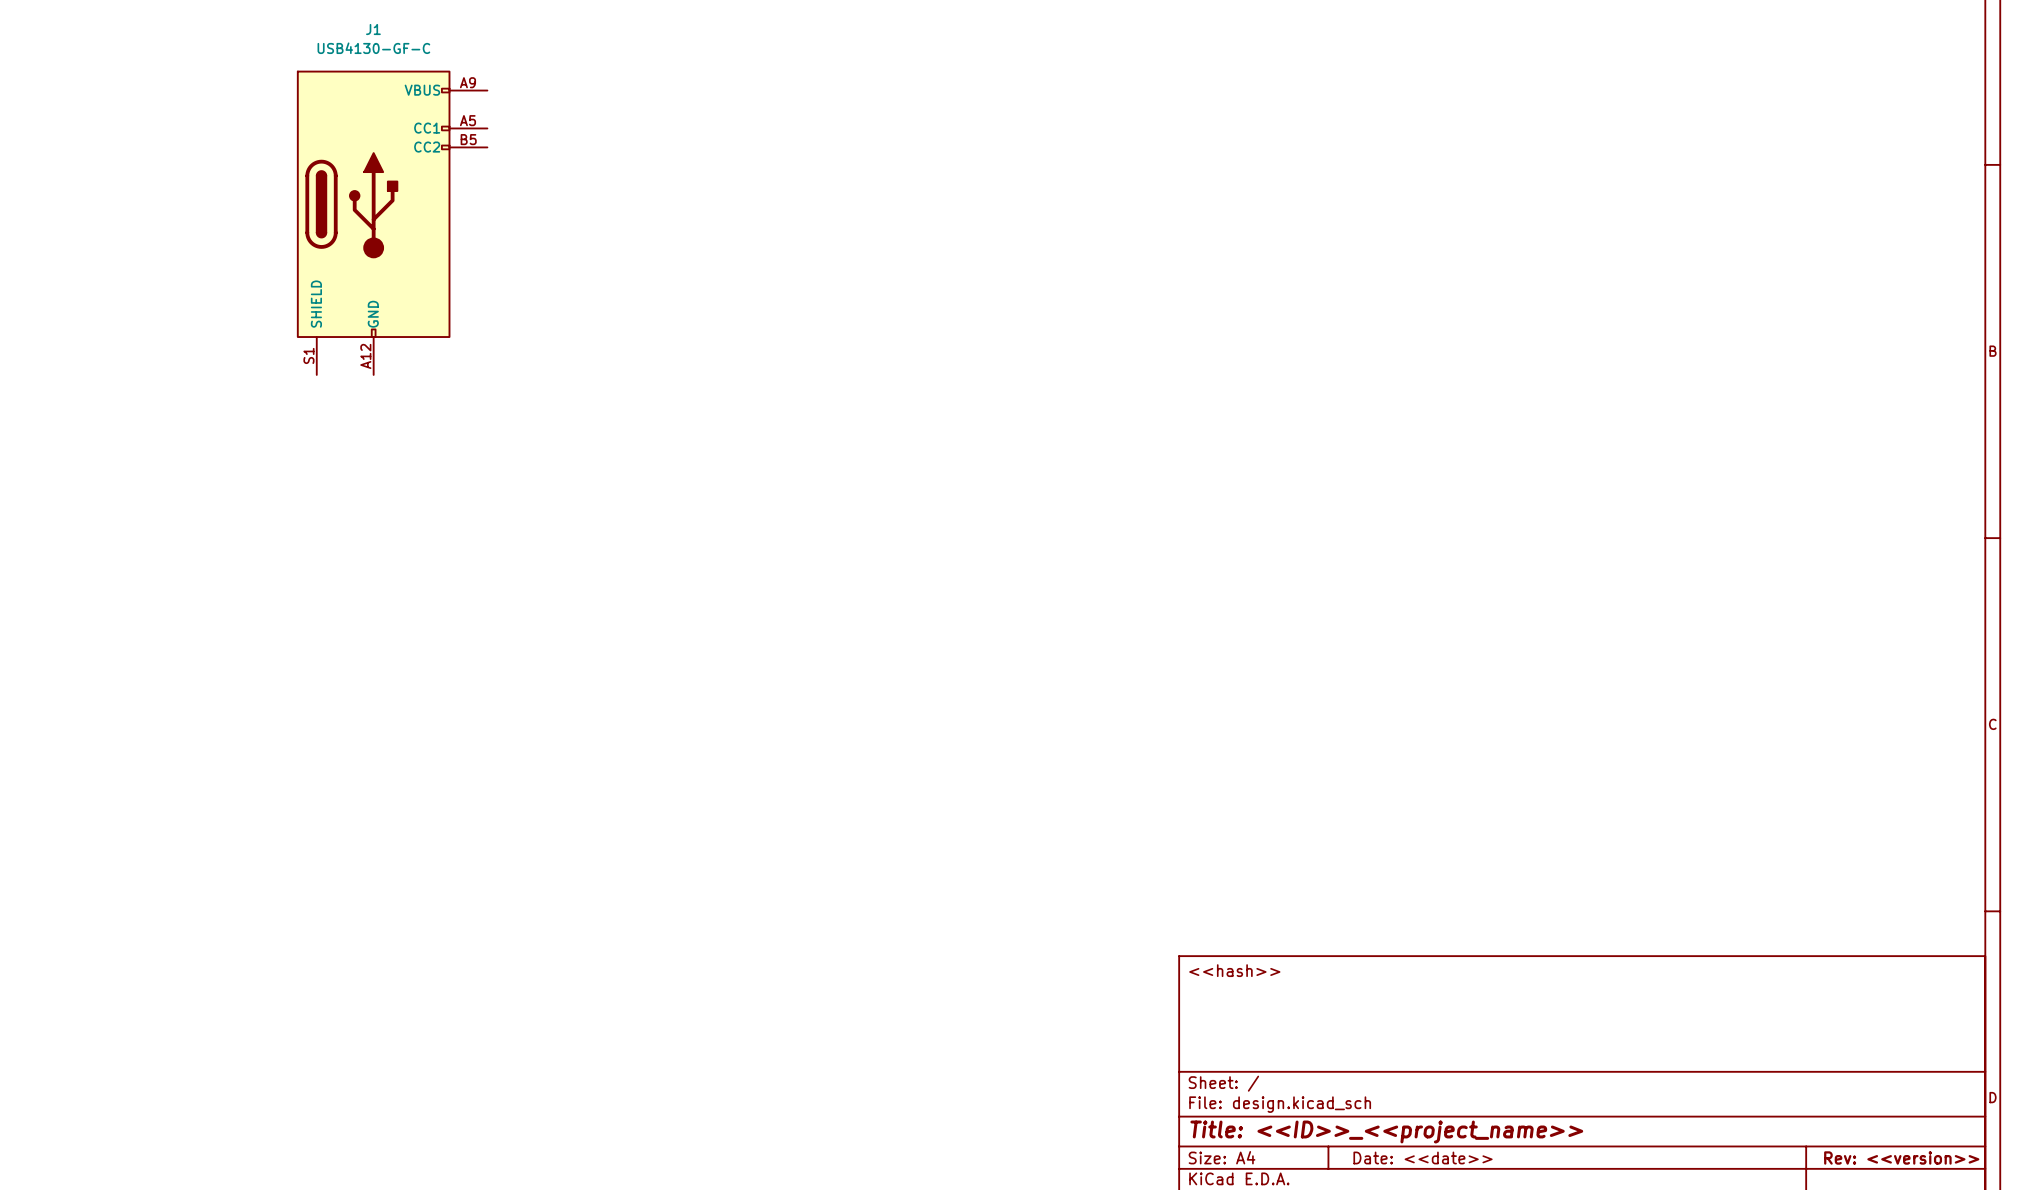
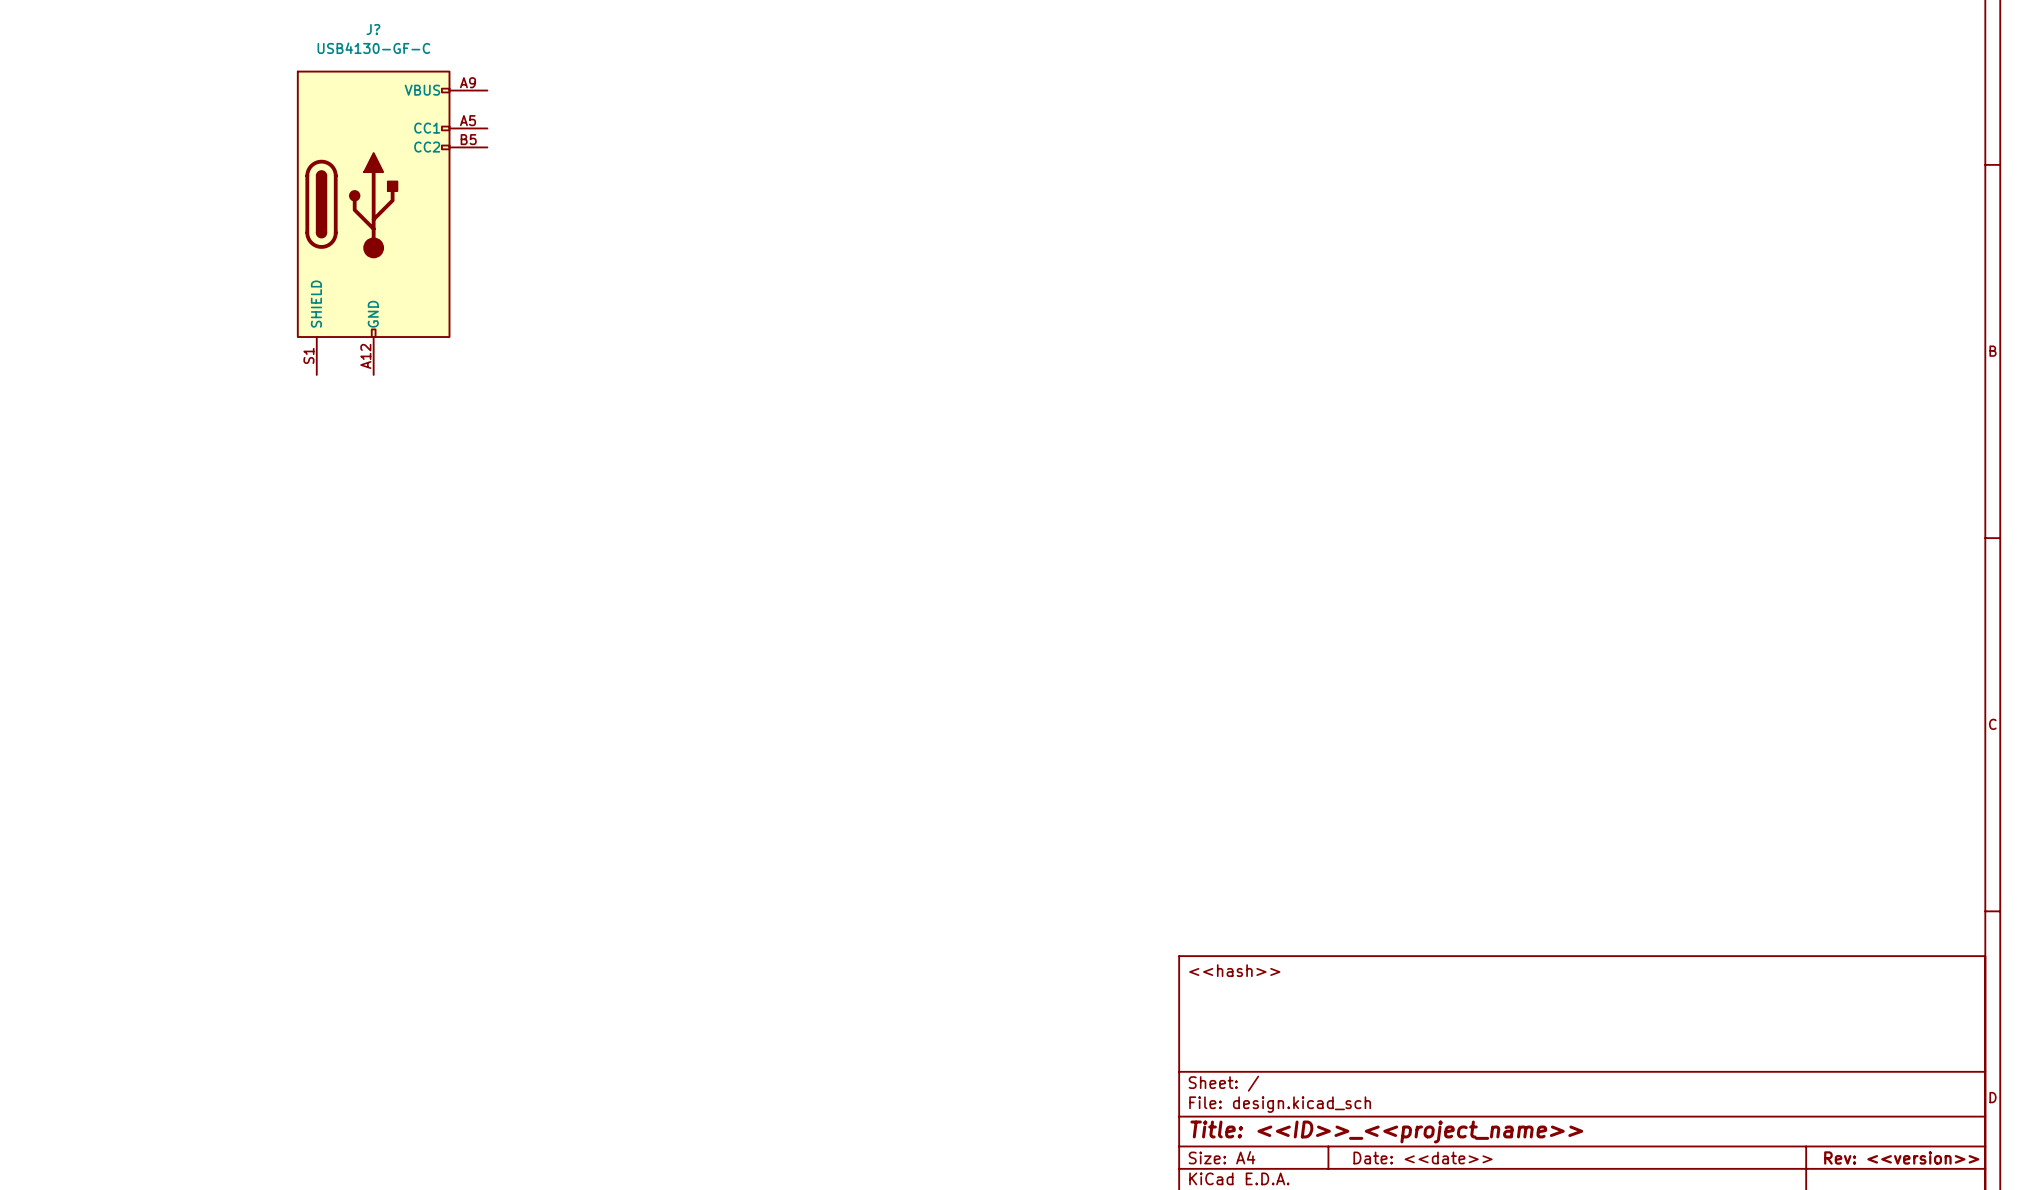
J1 name: J1 (373, 29) -> J? (373, 29)

